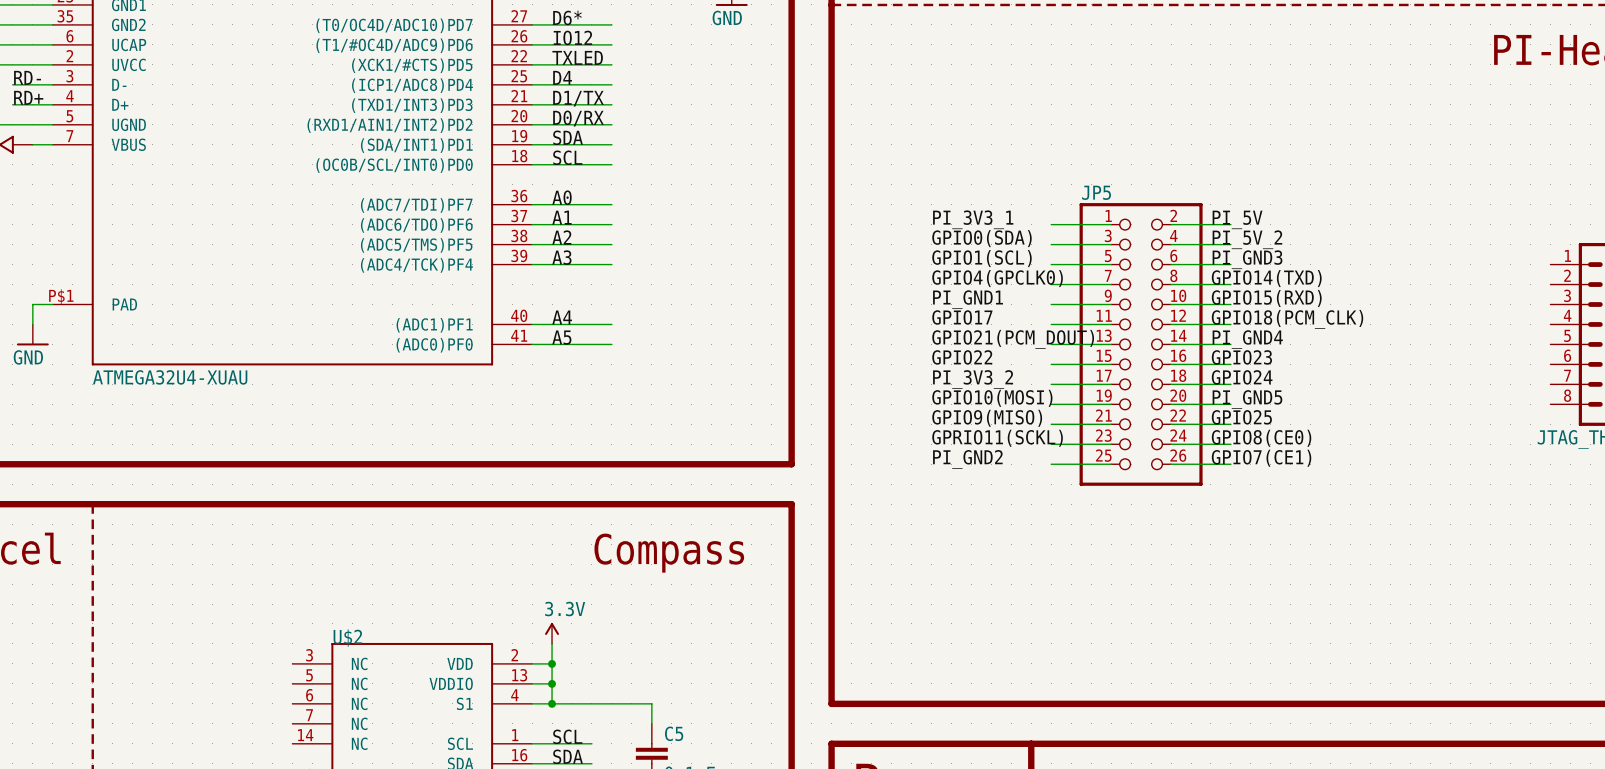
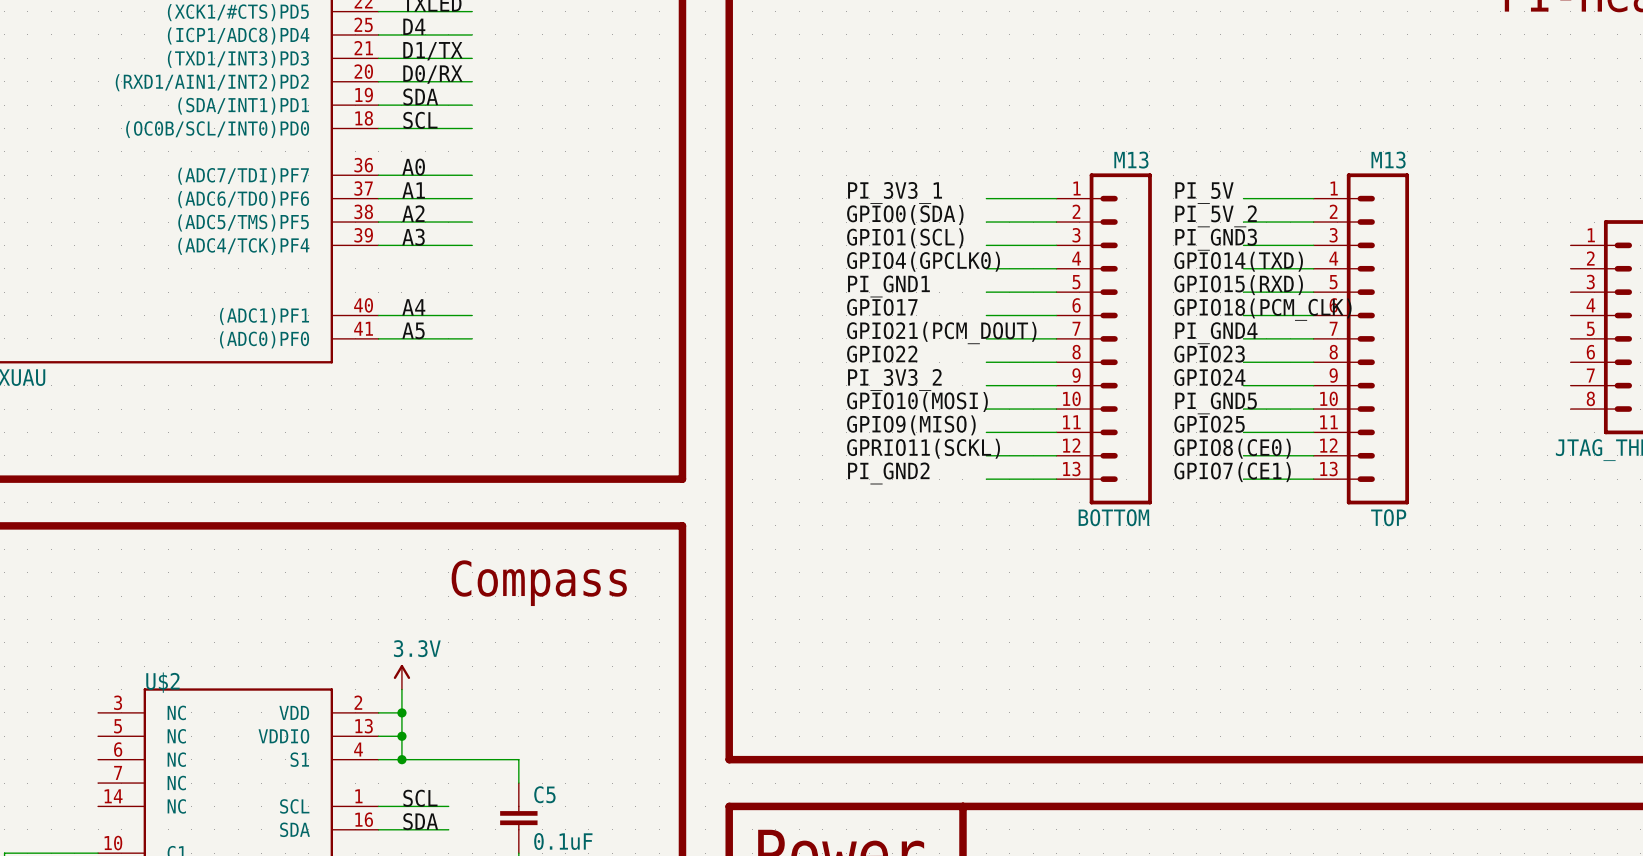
wire: (1171, 224) (1230, 224) -> (1243, 198) (1313, 198)
wire: (1171, 244) (1230, 244) -> (1243, 222) (1313, 222)
wire: (1171, 264) (1230, 264) -> (1243, 245) (1313, 245)
wire: (1171, 284) (1230, 284) -> (1243, 268) (1313, 268)
wire: (1171, 304) (1230, 304) -> (1243, 292) (1313, 292)
wire: (1171, 324) (1230, 324) -> (1243, 315) (1313, 315)
JP5: (1141, 344) -> none
BOTTOM: none -> M13 (1104, 338)
wire: (1171, 344) (1230, 344) -> (1243, 338) (1313, 338)
TOP: none -> M13 (1361, 338)
wire: (1171, 364) (1230, 364) -> (1243, 362) (1313, 362)
wire: (1171, 384) (1230, 384) -> (1243, 385) (1313, 385)
wire: (1171, 404) (1230, 404) -> (1243, 409) (1313, 409)
wire: (1171, 424) (1230, 424) -> (1243, 432) (1313, 432)
wire: (1171, 444) (1230, 444) -> (1243, 455) (1313, 455)
wire: (1171, 464) (1230, 464) -> (1243, 479) (1313, 479)

